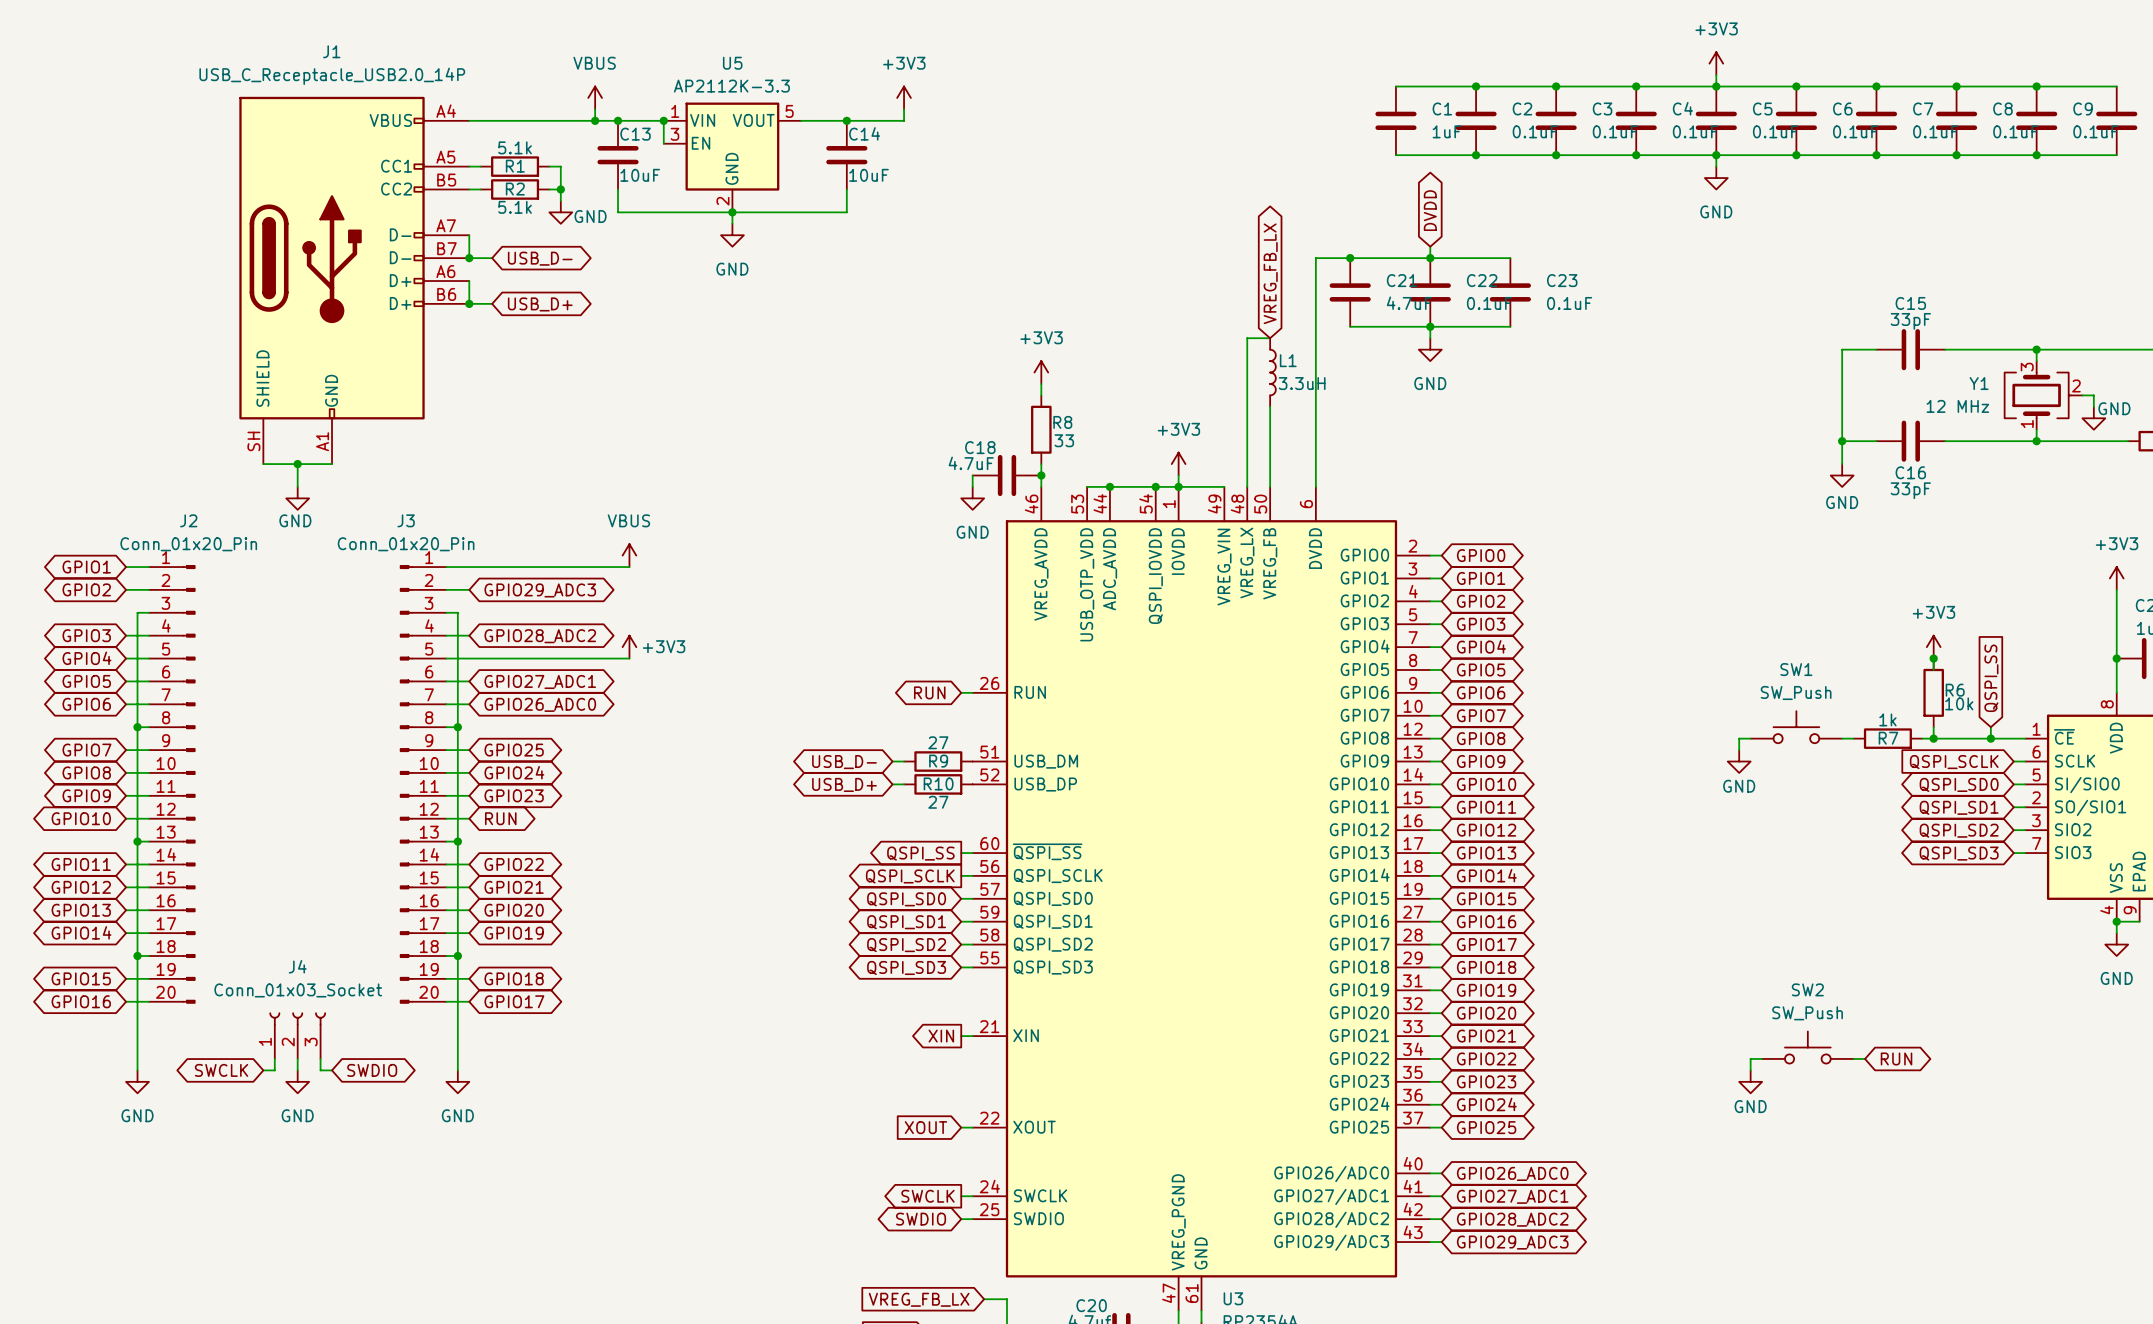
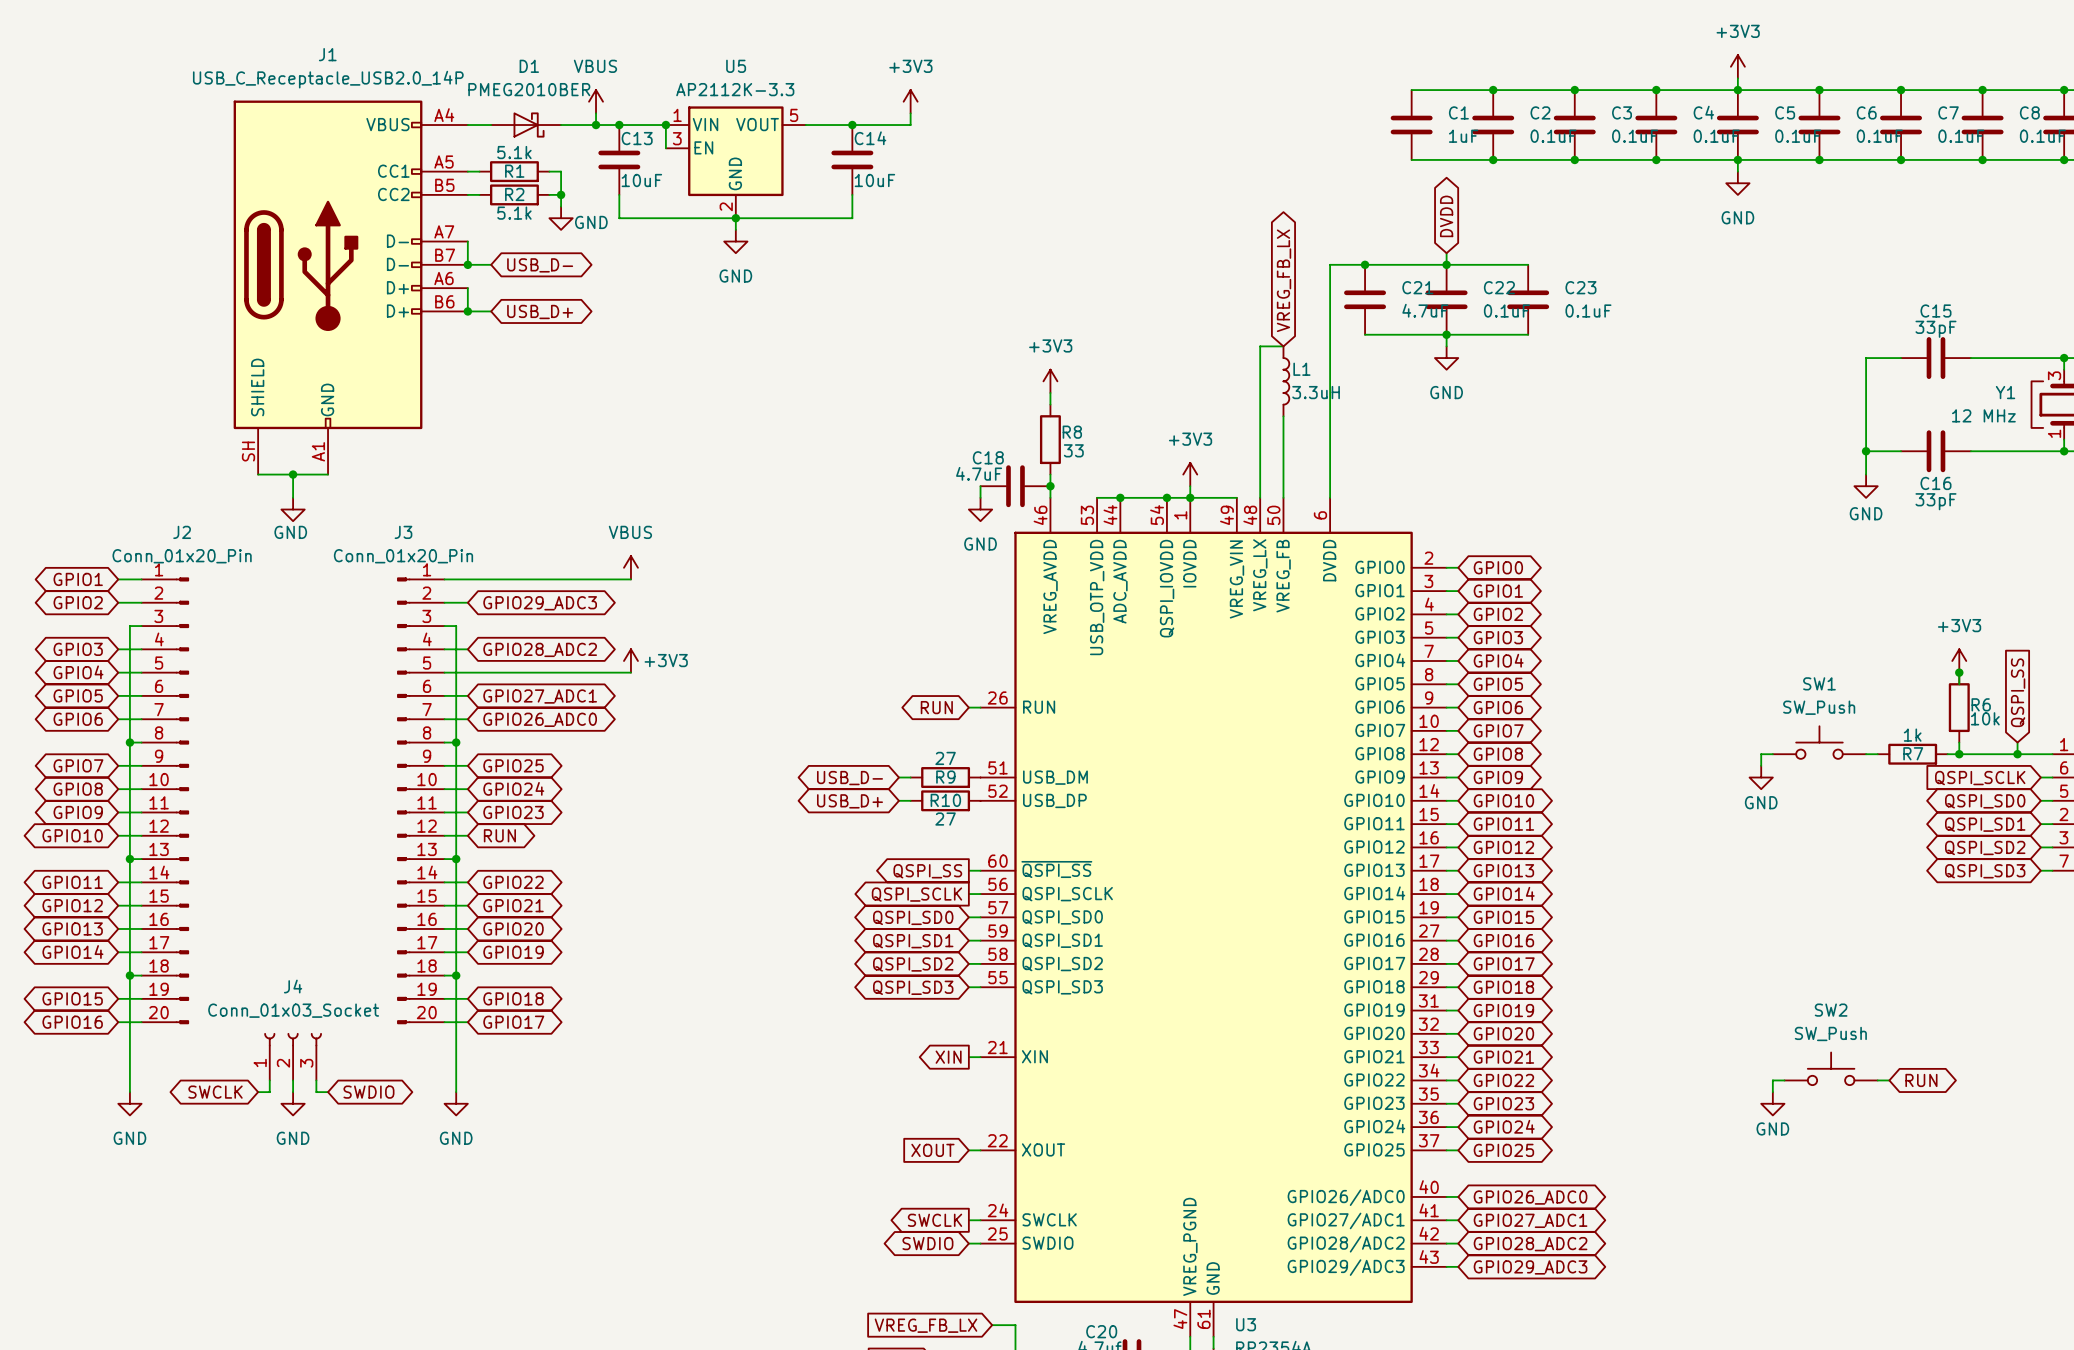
D1: none -> PMEG2010BER (526, 125)

